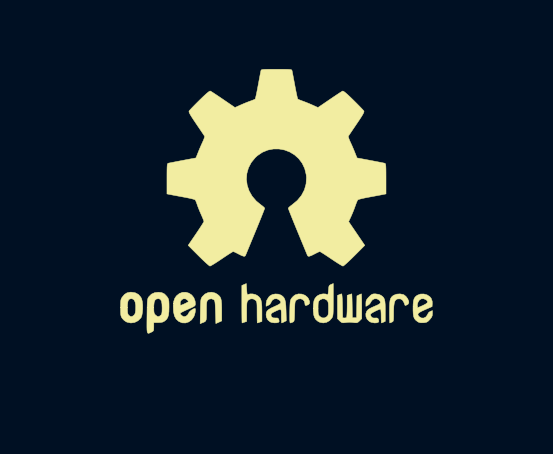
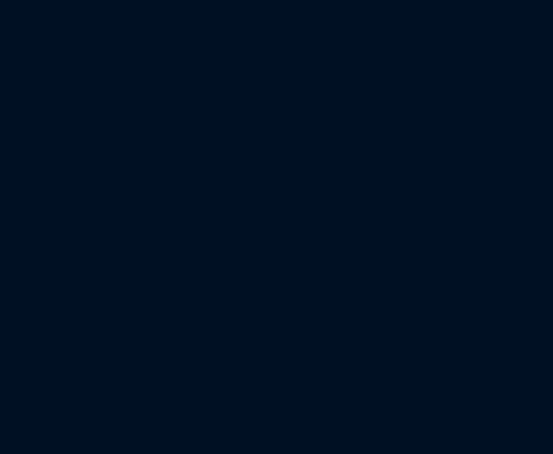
drawing: [120, 69, 433, 334] -> none

